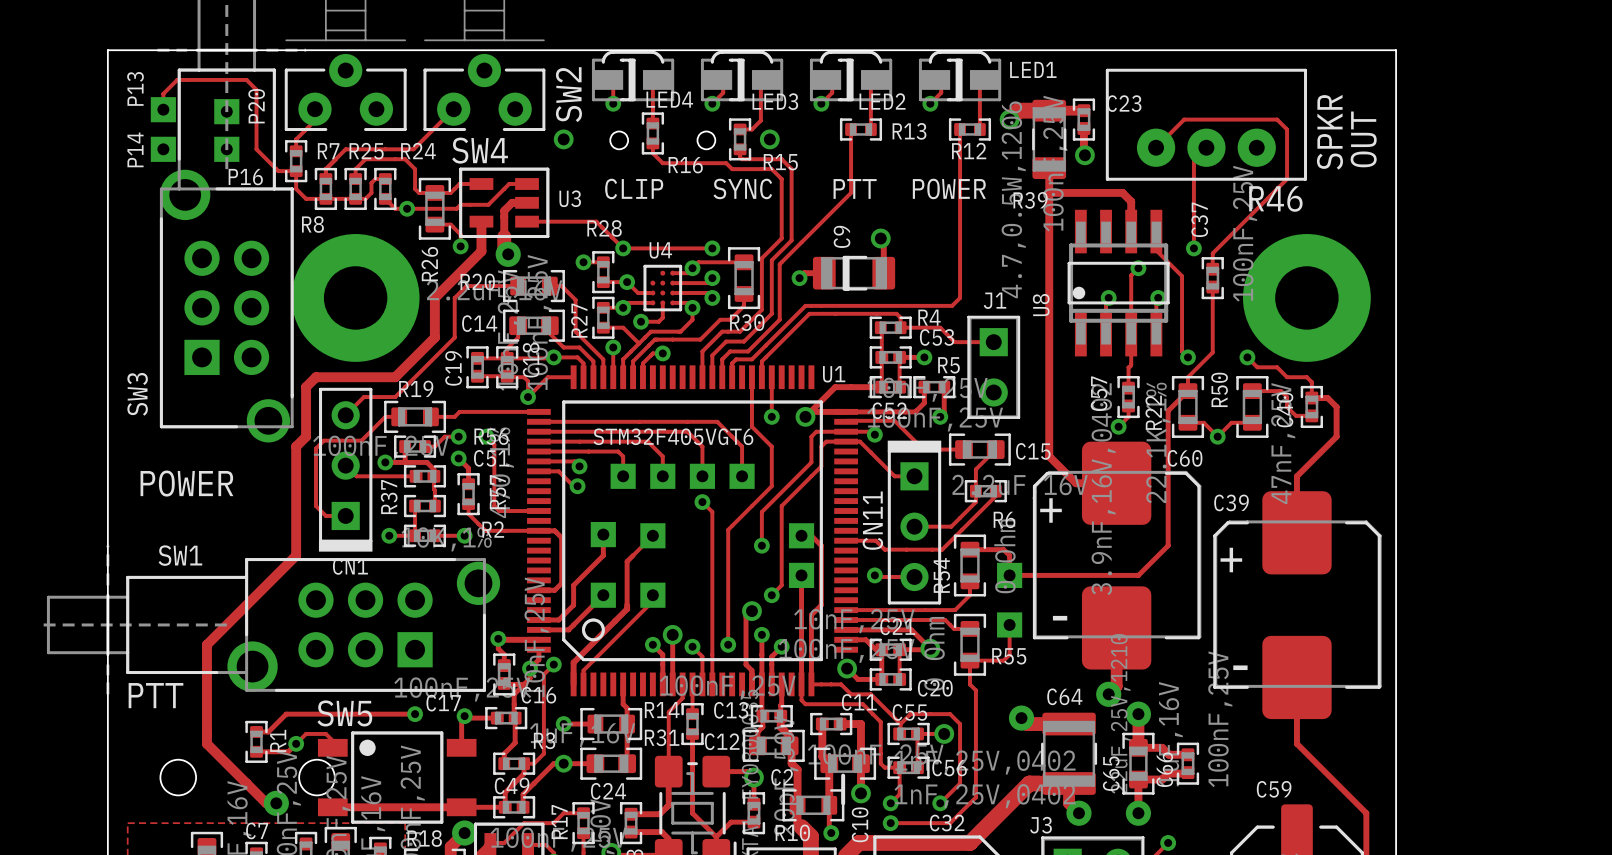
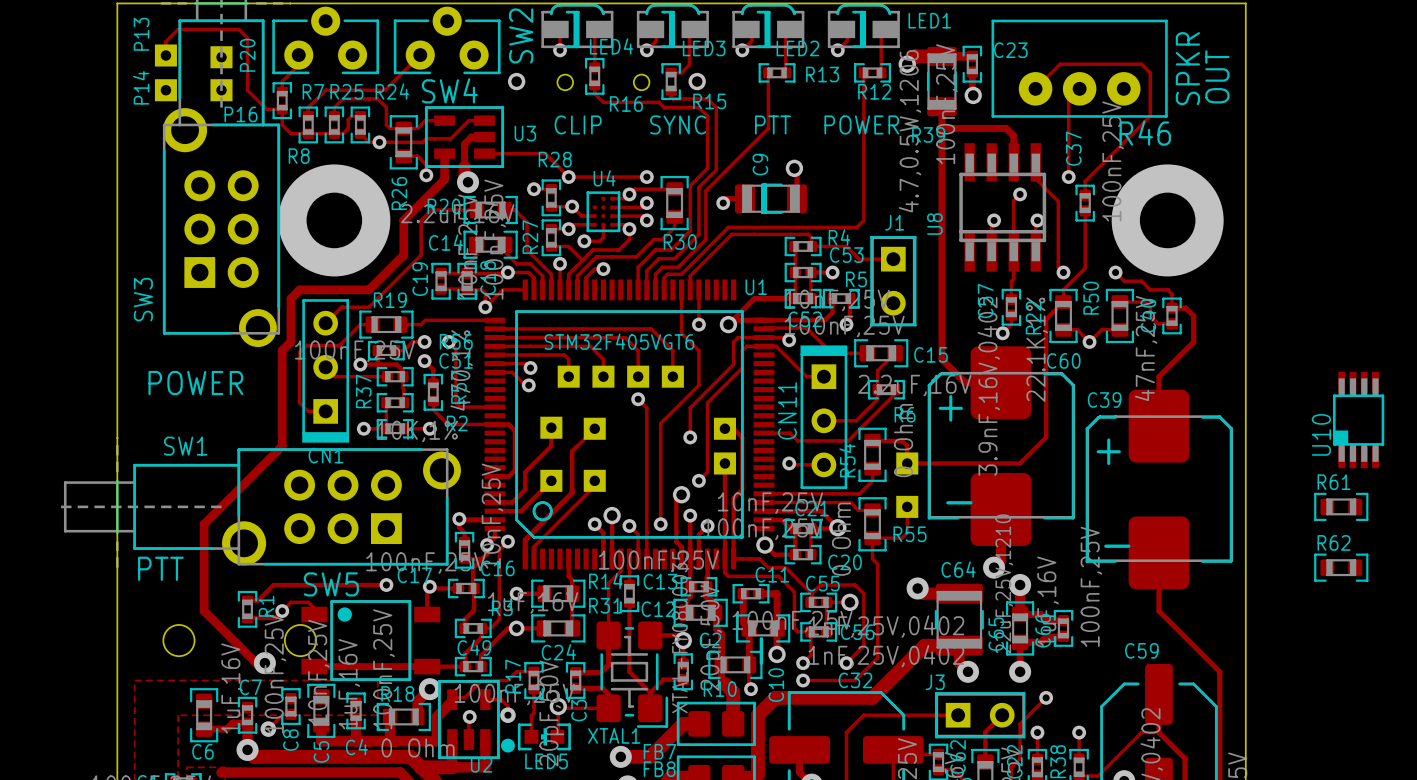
U8 footprint: [1067, 209, 1170, 357] -> [959, 143, 1047, 272]
U10: none -> (1358, 420)
R61: none -> (1341, 506)
R62: none -> (1341, 567)

